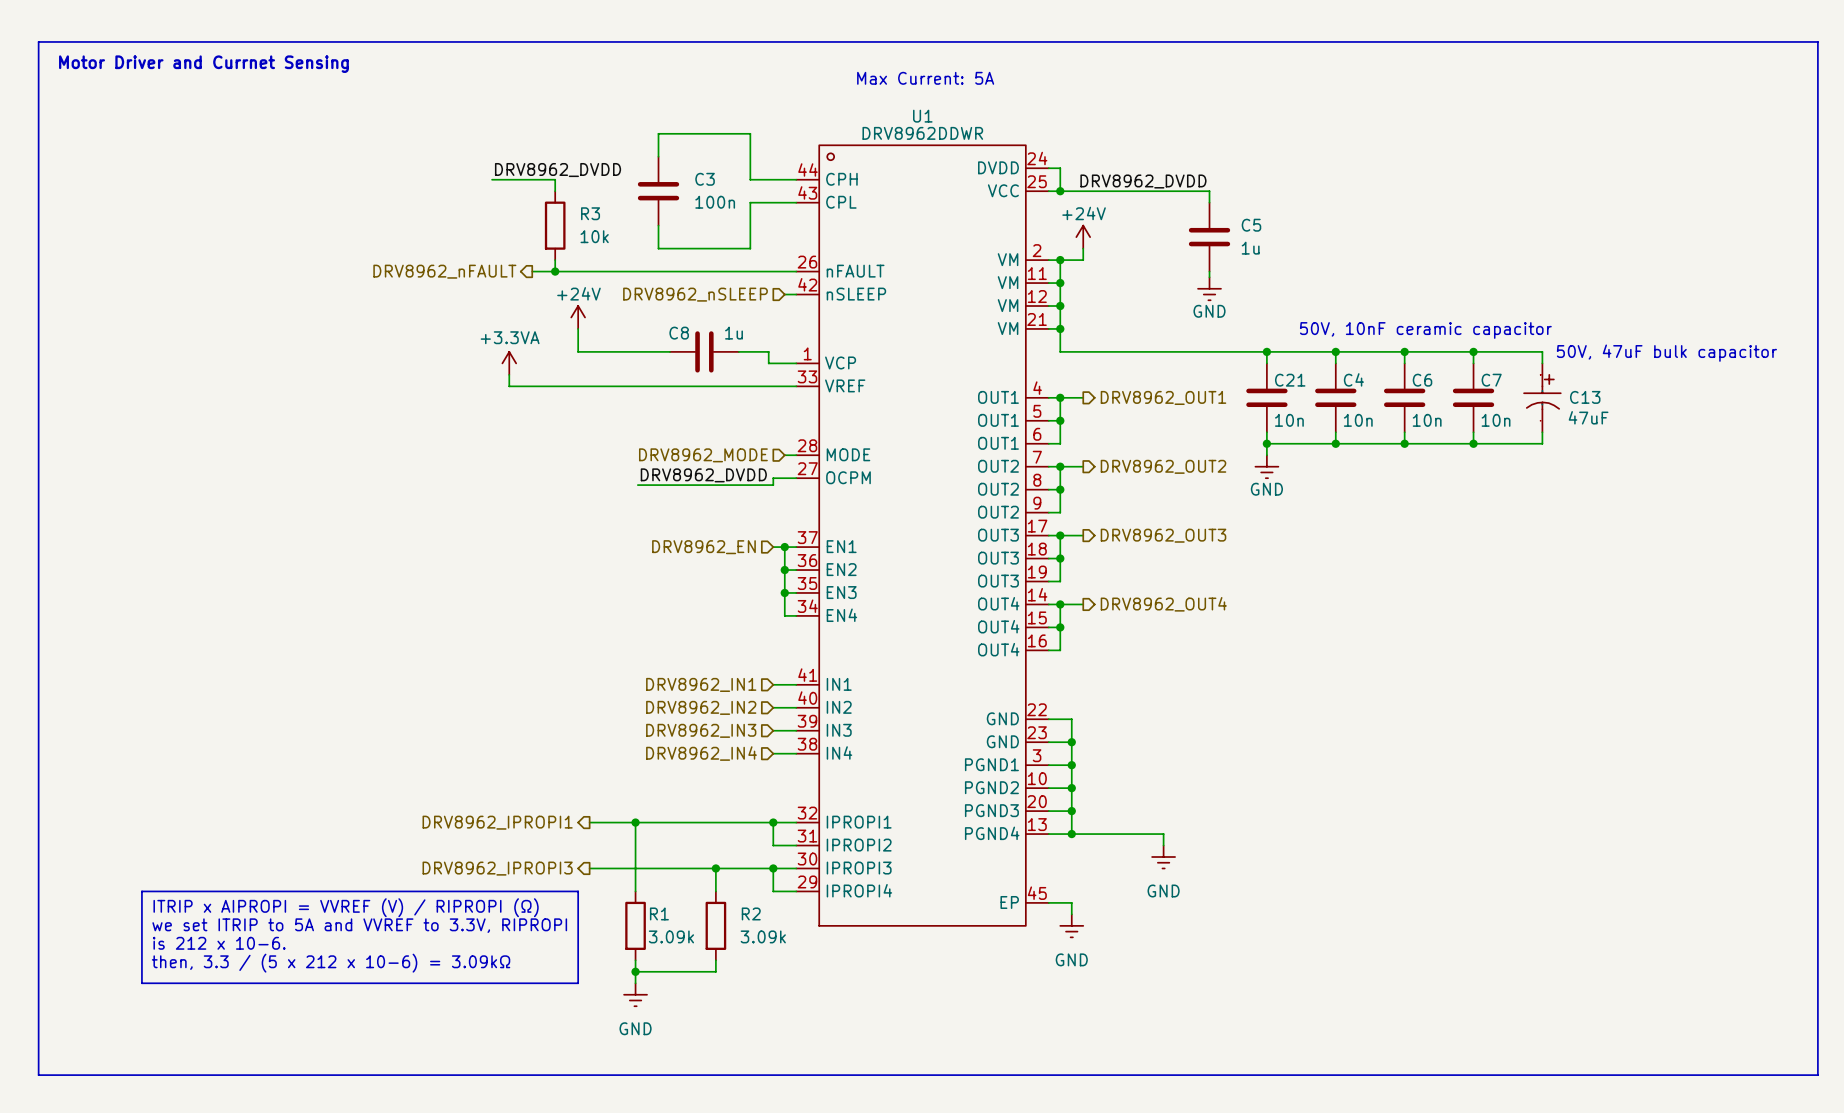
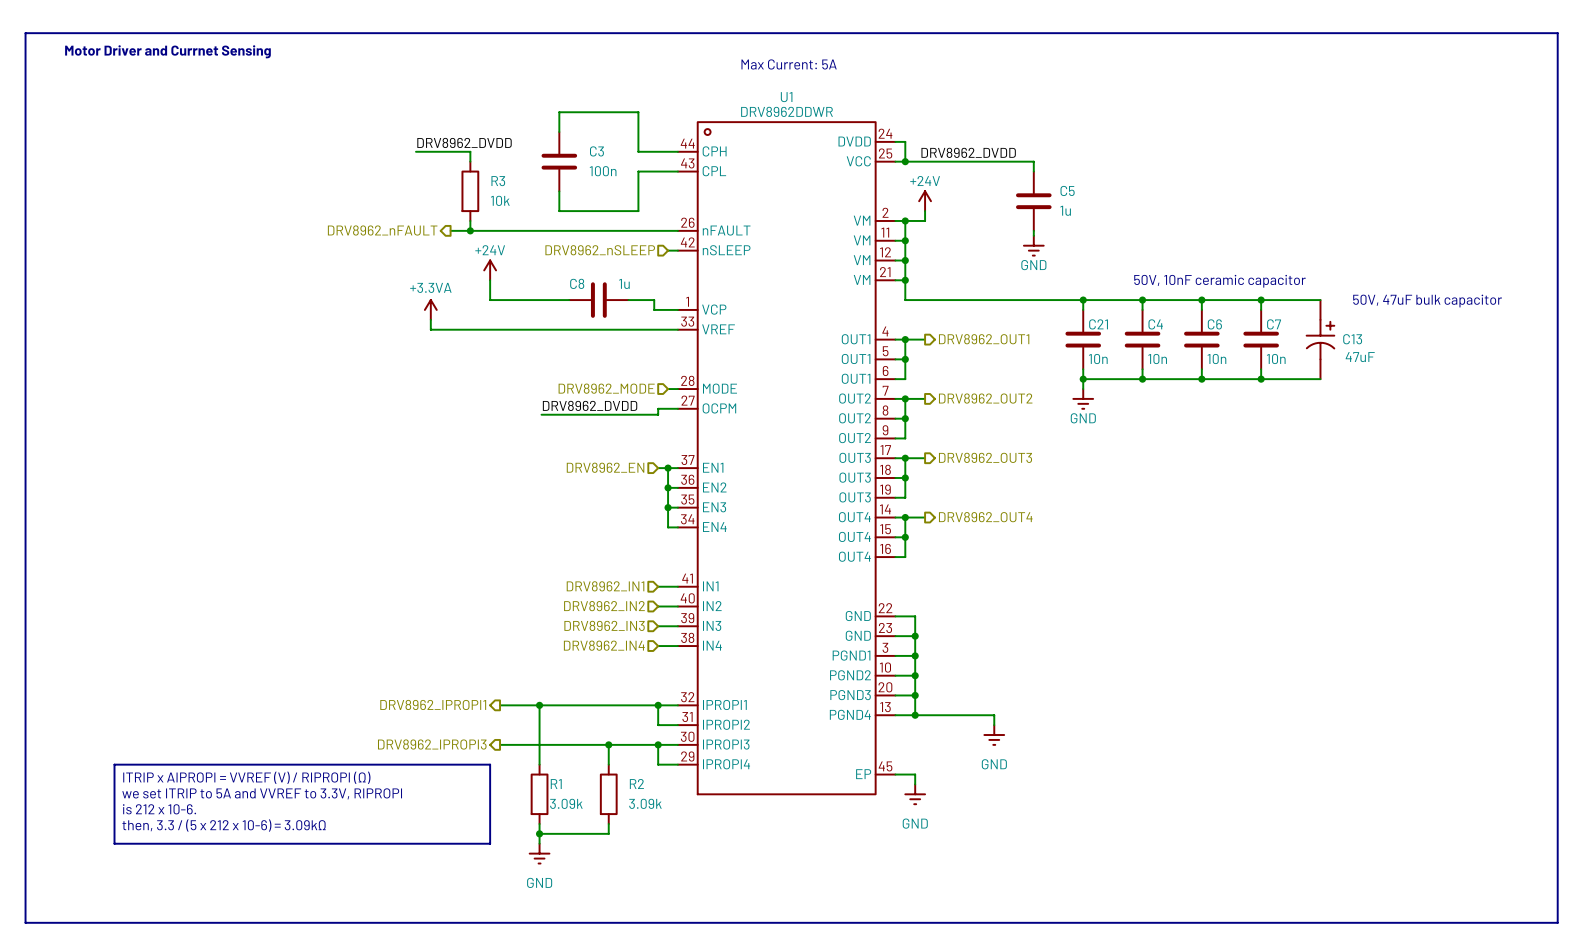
C13 symbol: [1524, 363, 1561, 433] -> [1306, 300, 1335, 380]

